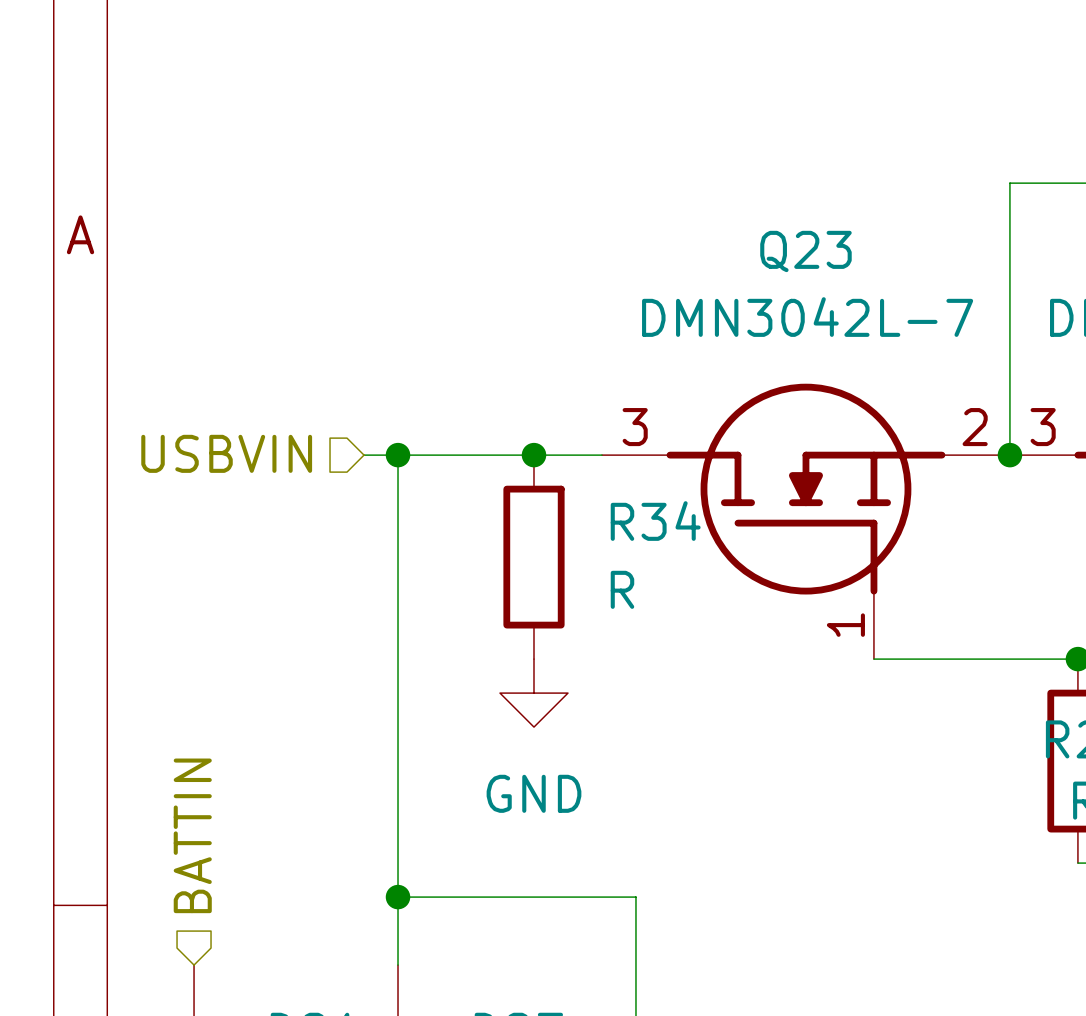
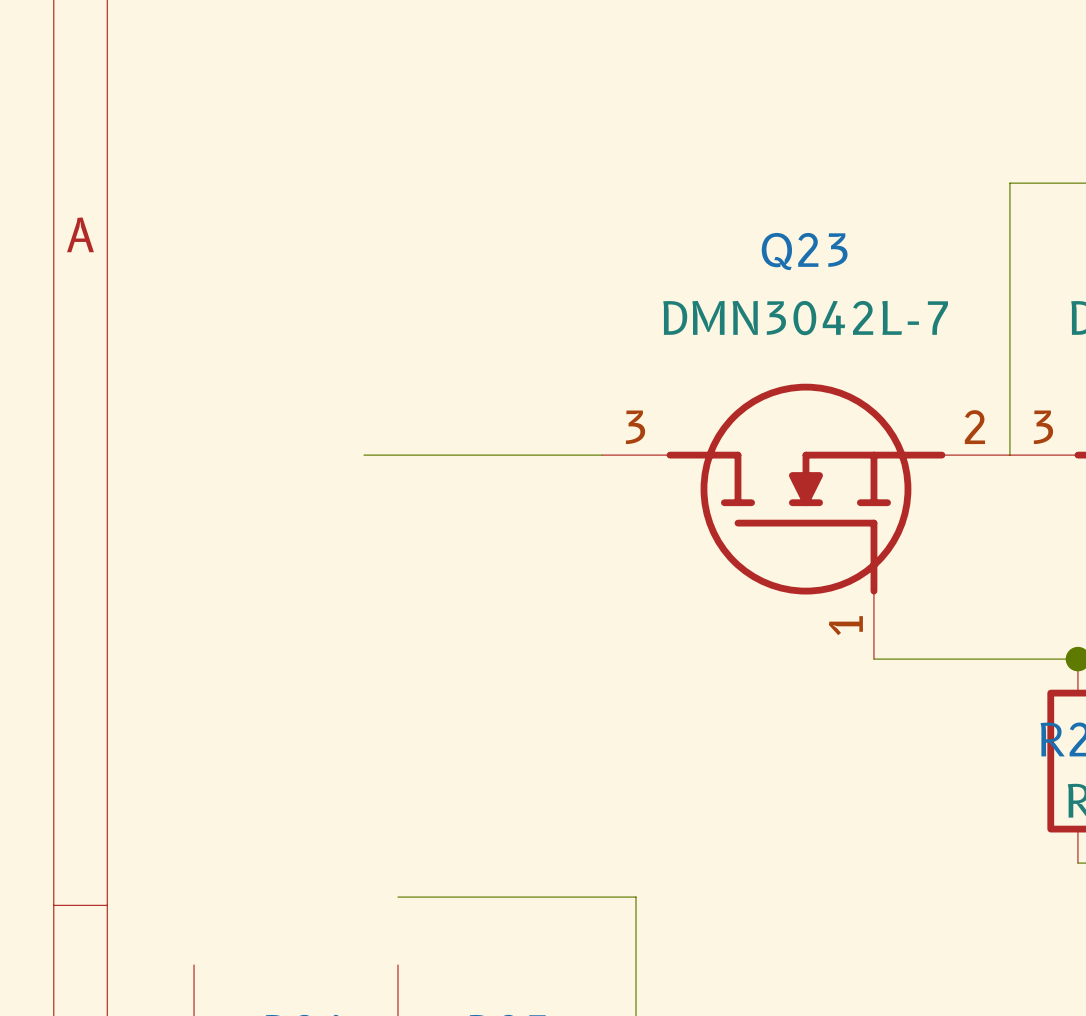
hierarchical label: USBVIN (226, 453) -> none
wire: (398, 455) (398, 965) -> none
junction: (398, 455) -> none
junction: (533, 455) -> none
junction: (1009, 455) -> none
R34: R (533, 557) -> none
power symbol: GND (533, 693) -> none
hierarchical label: BATTIN (192, 835) -> none
junction: (398, 897) -> none

